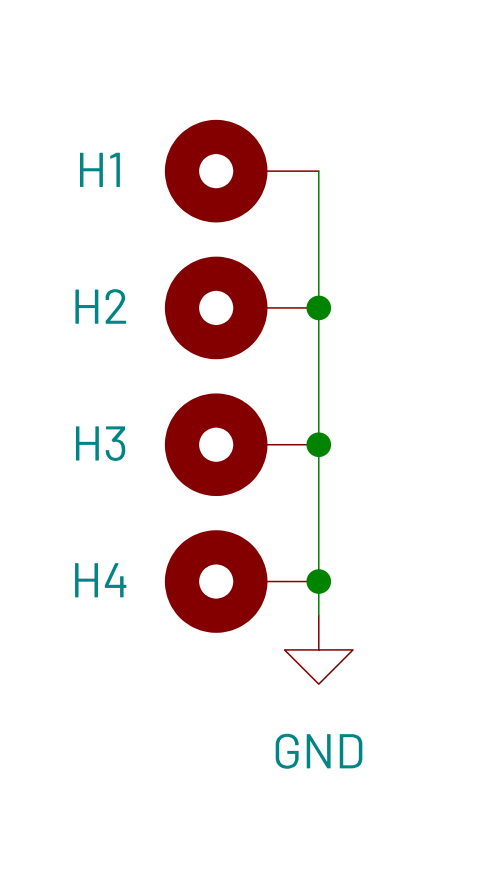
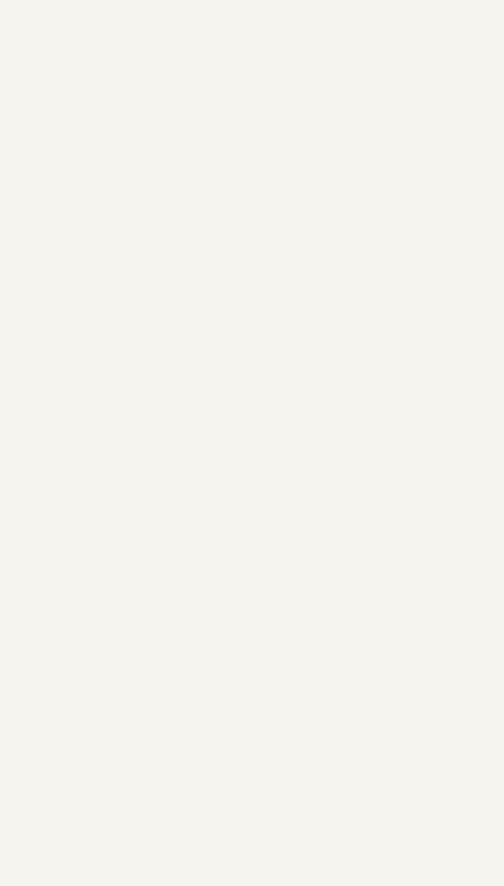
H1: (241, 171) -> none
wire: (318, 171) (318, 615) -> none
H2: (241, 307) -> none
junction: (318, 307) -> none
H3: (241, 444) -> none
junction: (318, 444) -> none
H4: (241, 581) -> none
junction: (318, 581) -> none
power symbol: GND (318, 649) -> none

